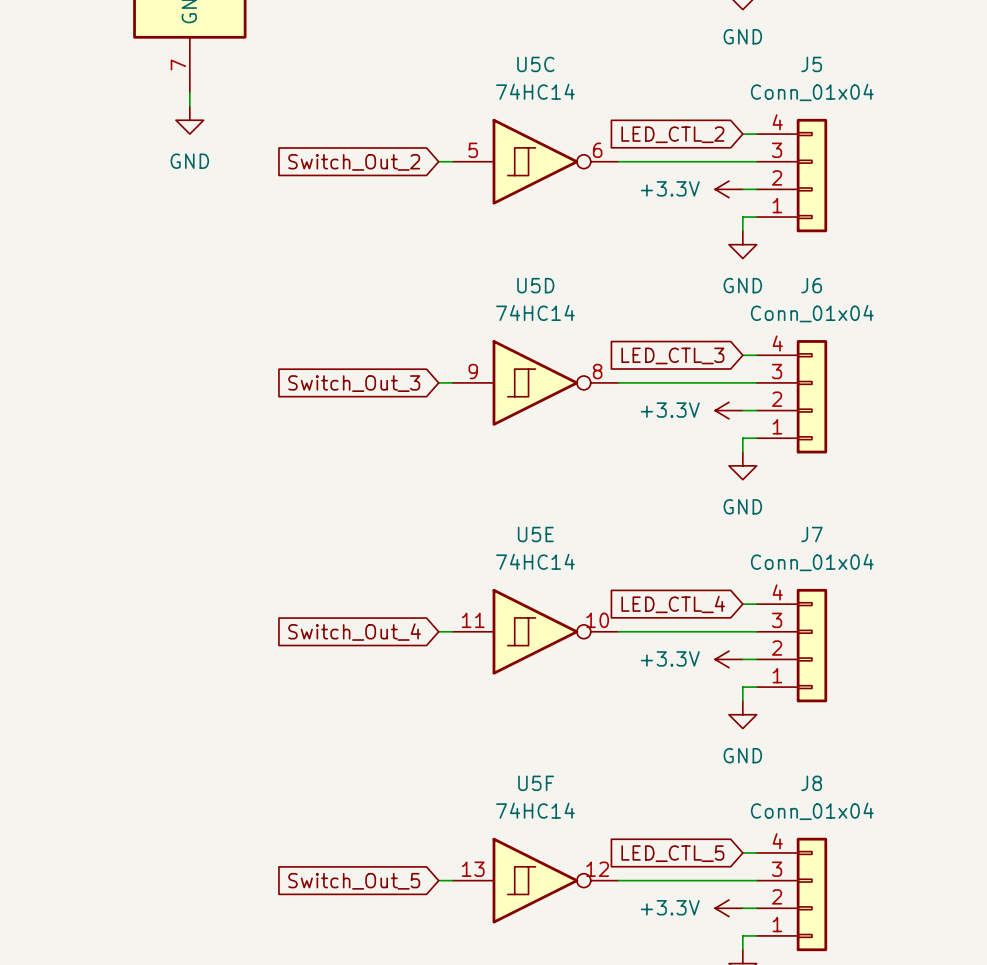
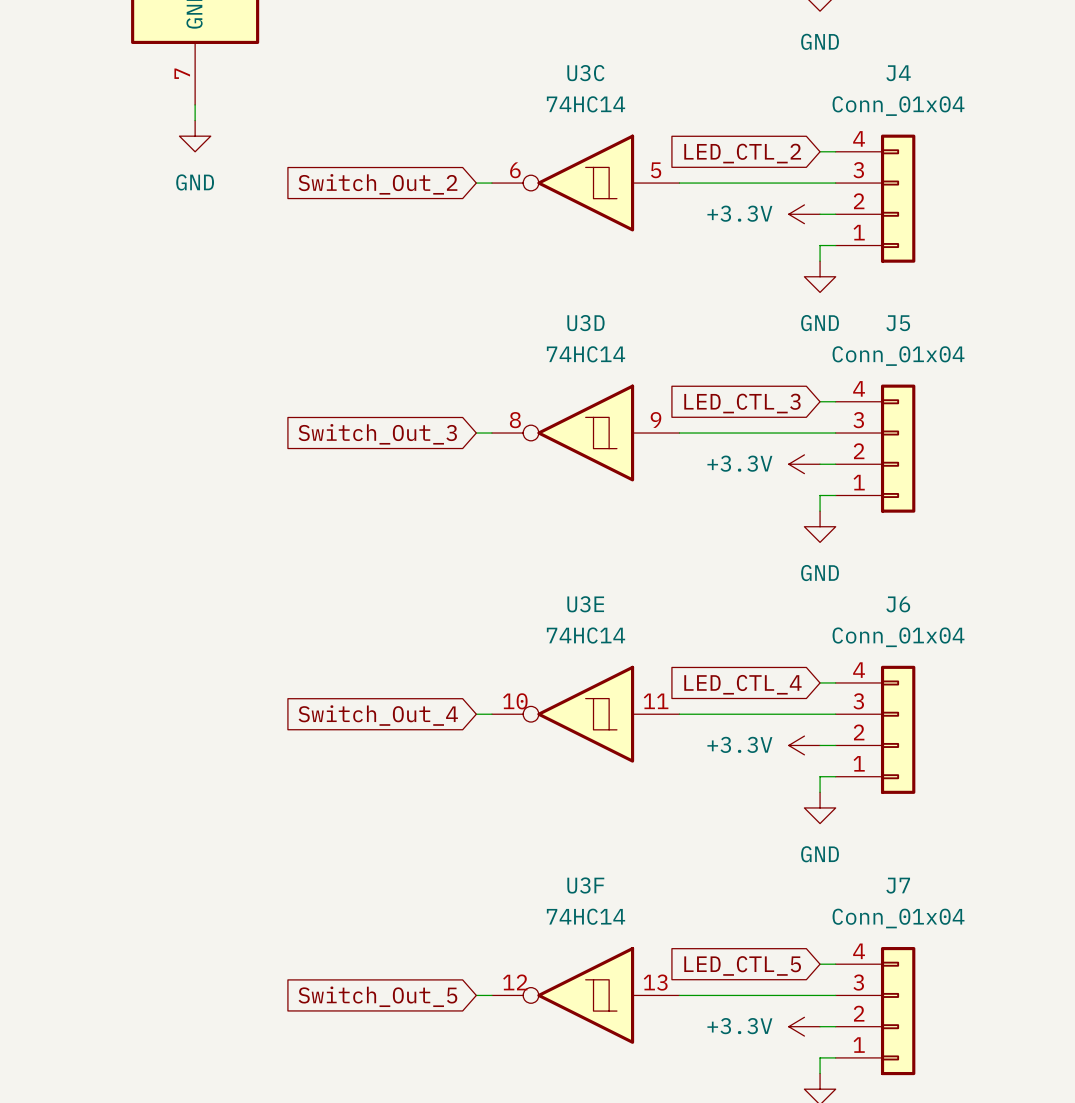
J5 name: J5 (811, 64) -> J4 (898, 73)
U5C: 74HC14 (535, 161) -> none
U3C: none -> 74HC14 (585, 183)
J6 name: J6 (811, 285) -> J5 (898, 323)
U5D: 74HC14 (535, 382) -> none
U3D: none -> 74HC14 (585, 433)
J7 name: J7 (811, 534) -> J6 (898, 604)
U5E: 74HC14 (535, 631) -> none
U3E: none -> 74HC14 (585, 714)
J8 name: J8 (811, 783) -> J7 (898, 885)
U5F: 74HC14 (535, 880) -> none
U3F: none -> 74HC14 (585, 995)

